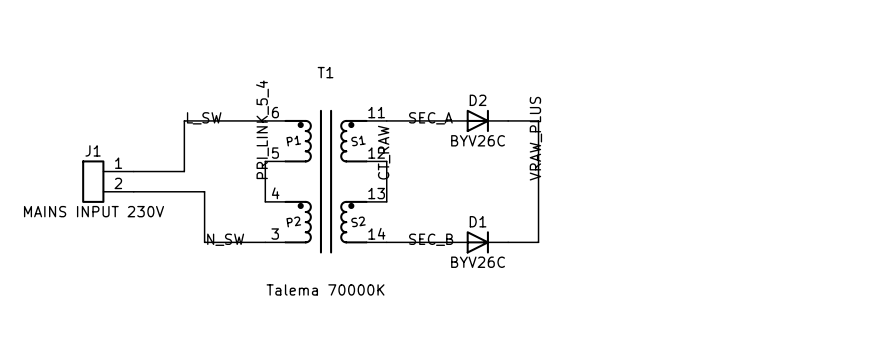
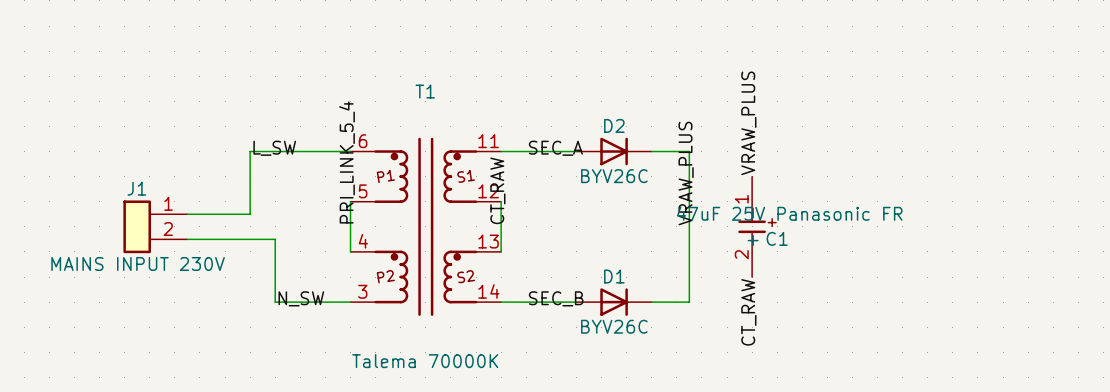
label: none -> VRAW_PLUS (748, 123)
C1: none -> 47uF 25V Panasonic FR (752, 226)
label: none -> CT_RAW (748, 312)

